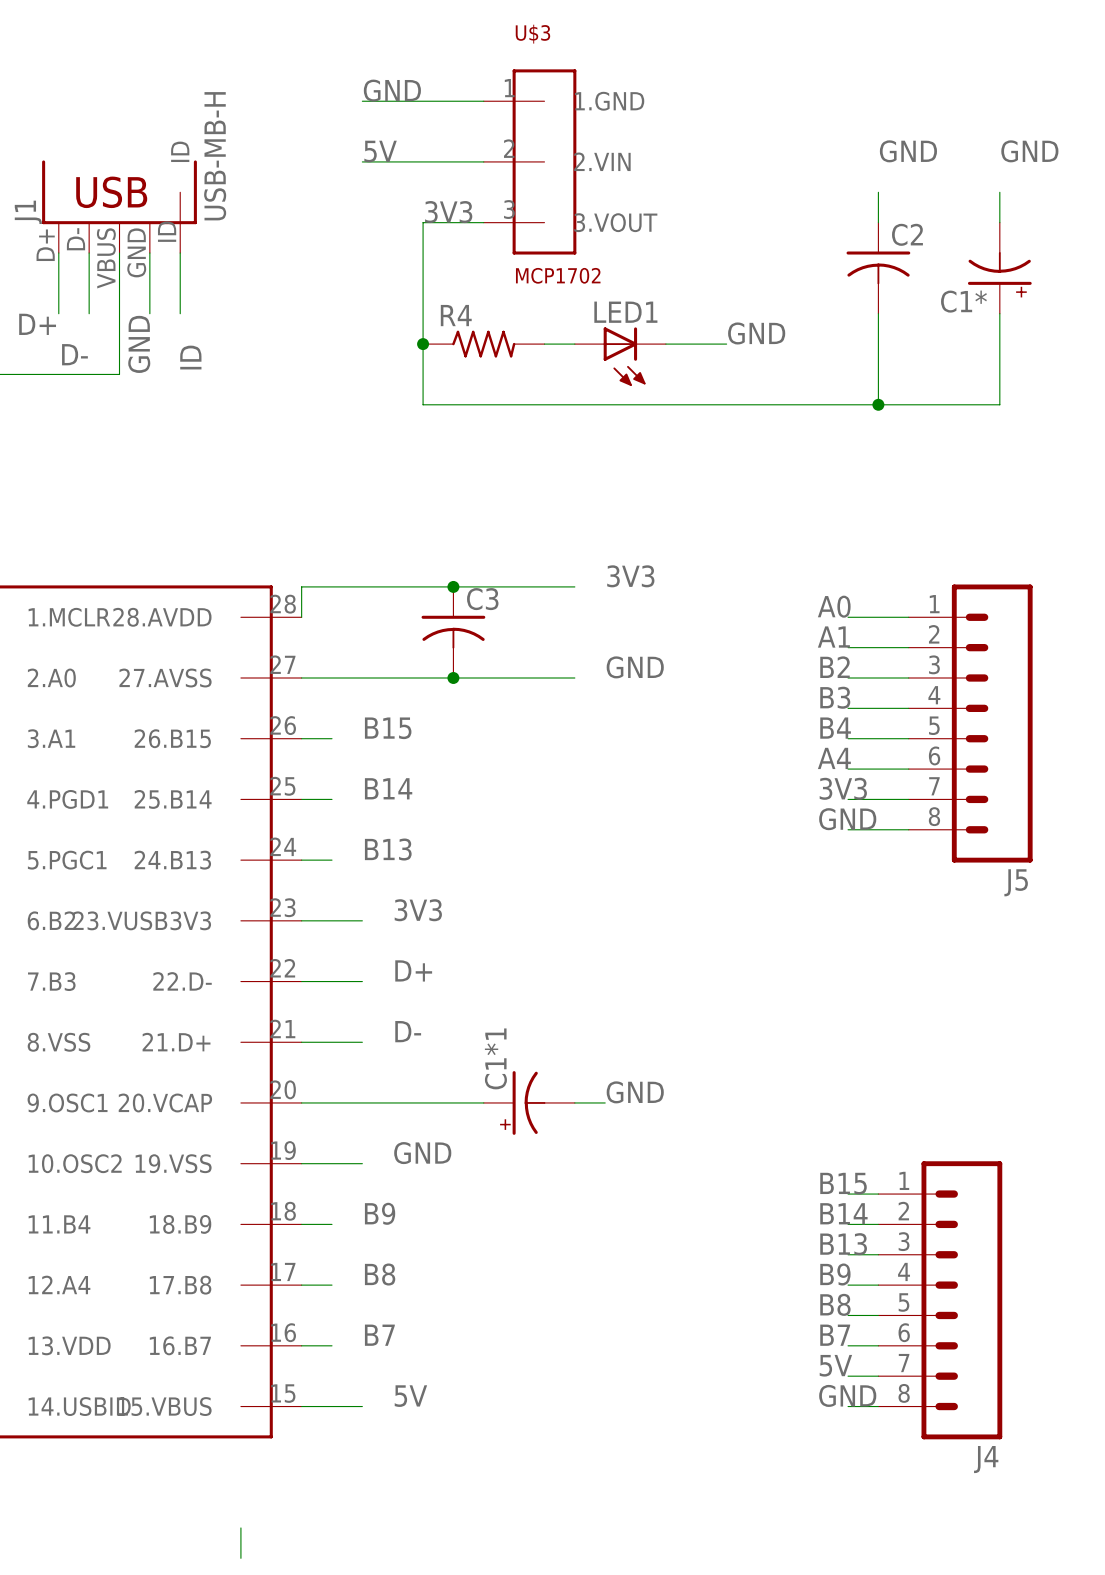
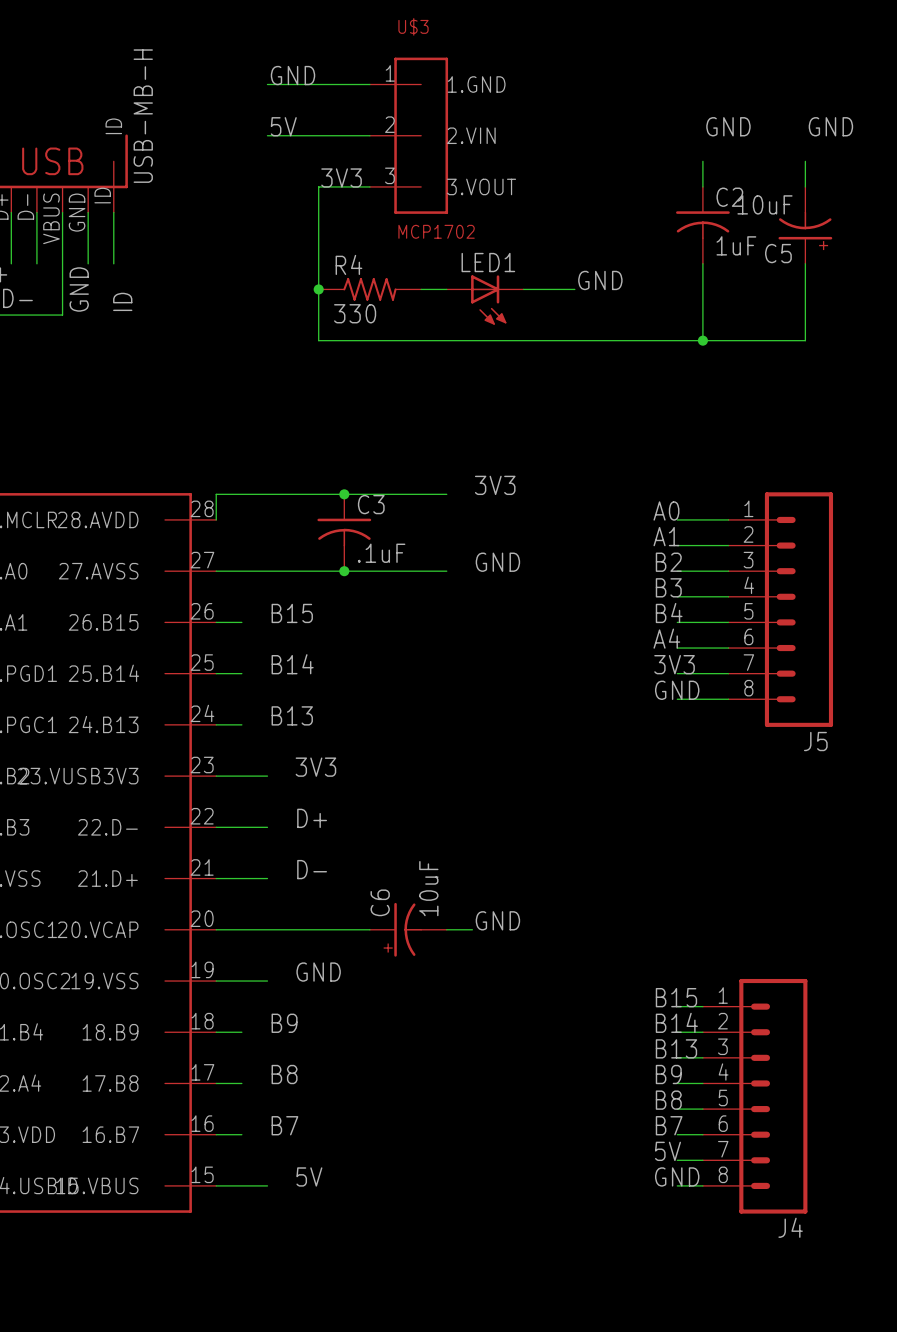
C1* value: none -> 10uF (764, 204)
C2 value: none -> 1uF (736, 245)
C1* name: C1* (963, 301) -> C5 (778, 253)
R4 value: none -> 330 (355, 313)
C3 value: none -> .1uF (381, 553)
C1*1 value: none -> 10uF (428, 888)
C1*1 name: C1*1 (495, 1058) -> C6 (380, 902)
wire: (240, 1527) (240, 1558) -> none

